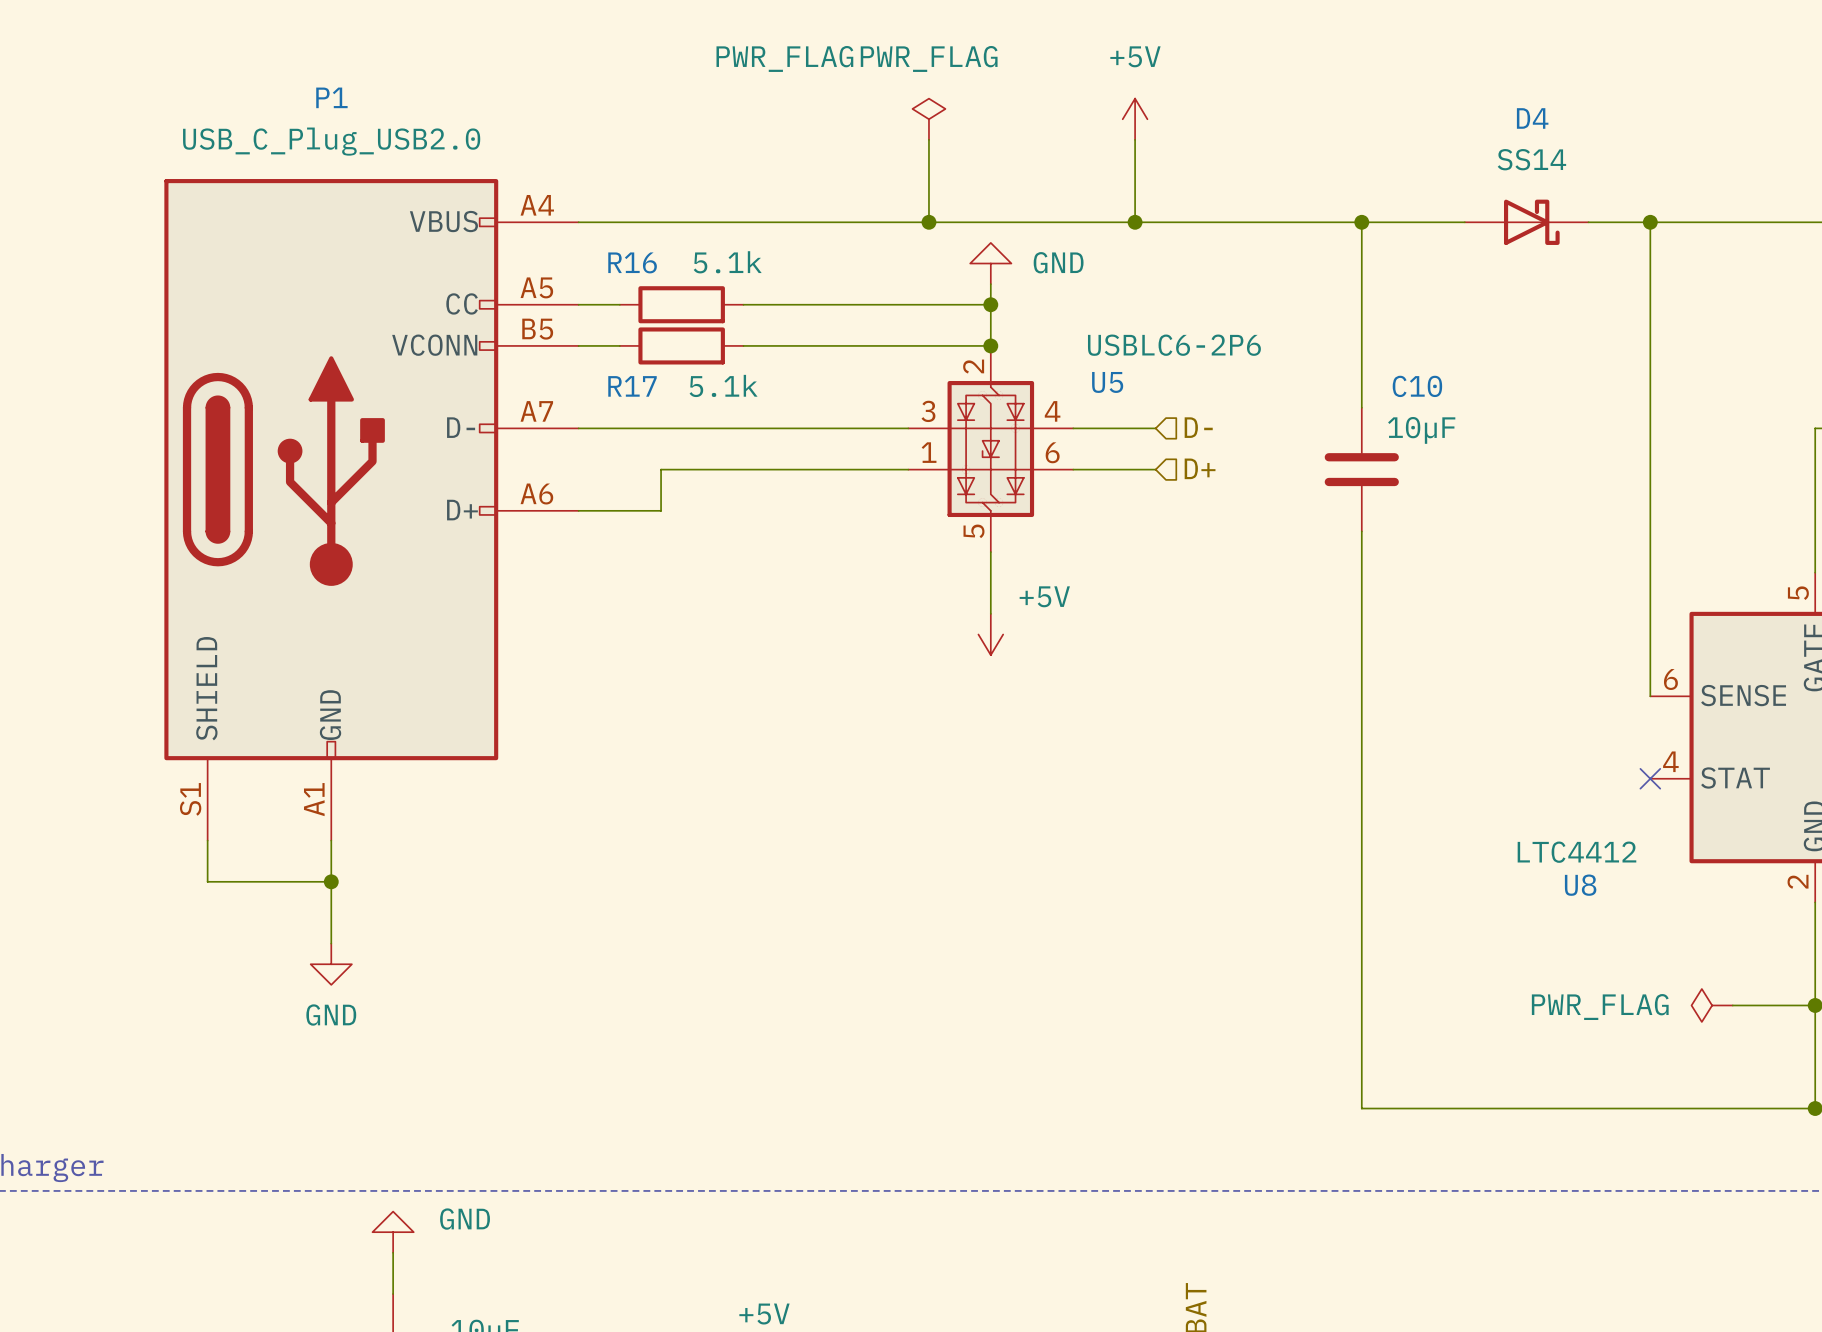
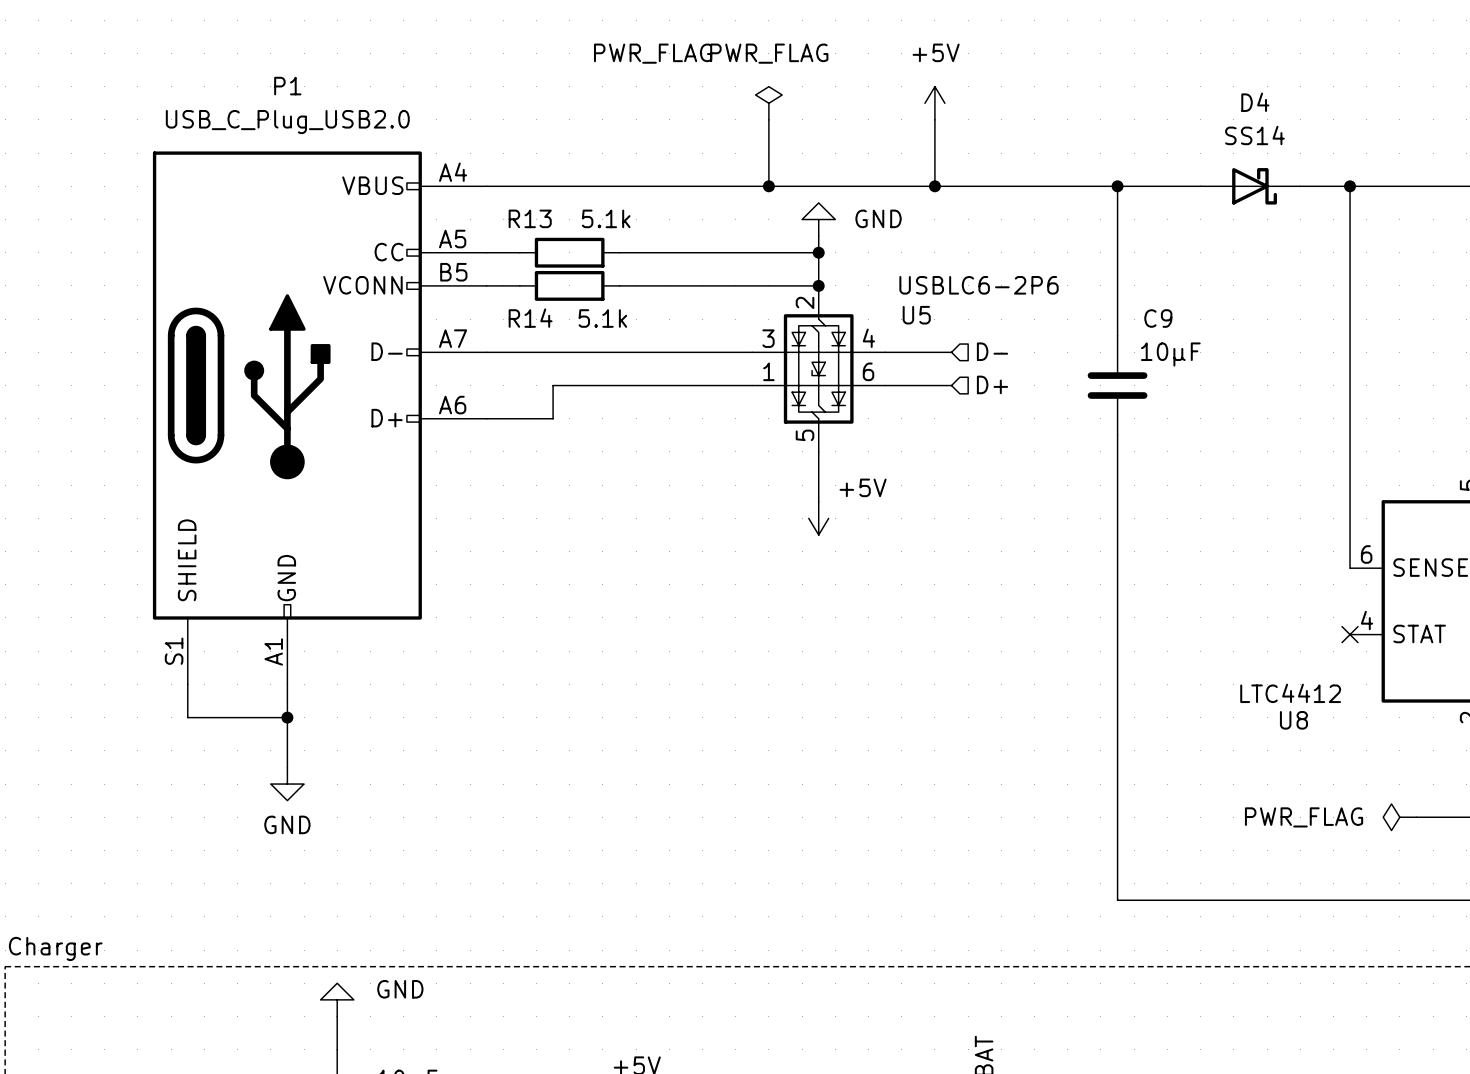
R16 name: R16 (632, 262) -> R13 (530, 218)
R17 name: R17 (632, 386) -> R14 (530, 318)
C10 name: C10 (1417, 386) -> C9 (1158, 318)

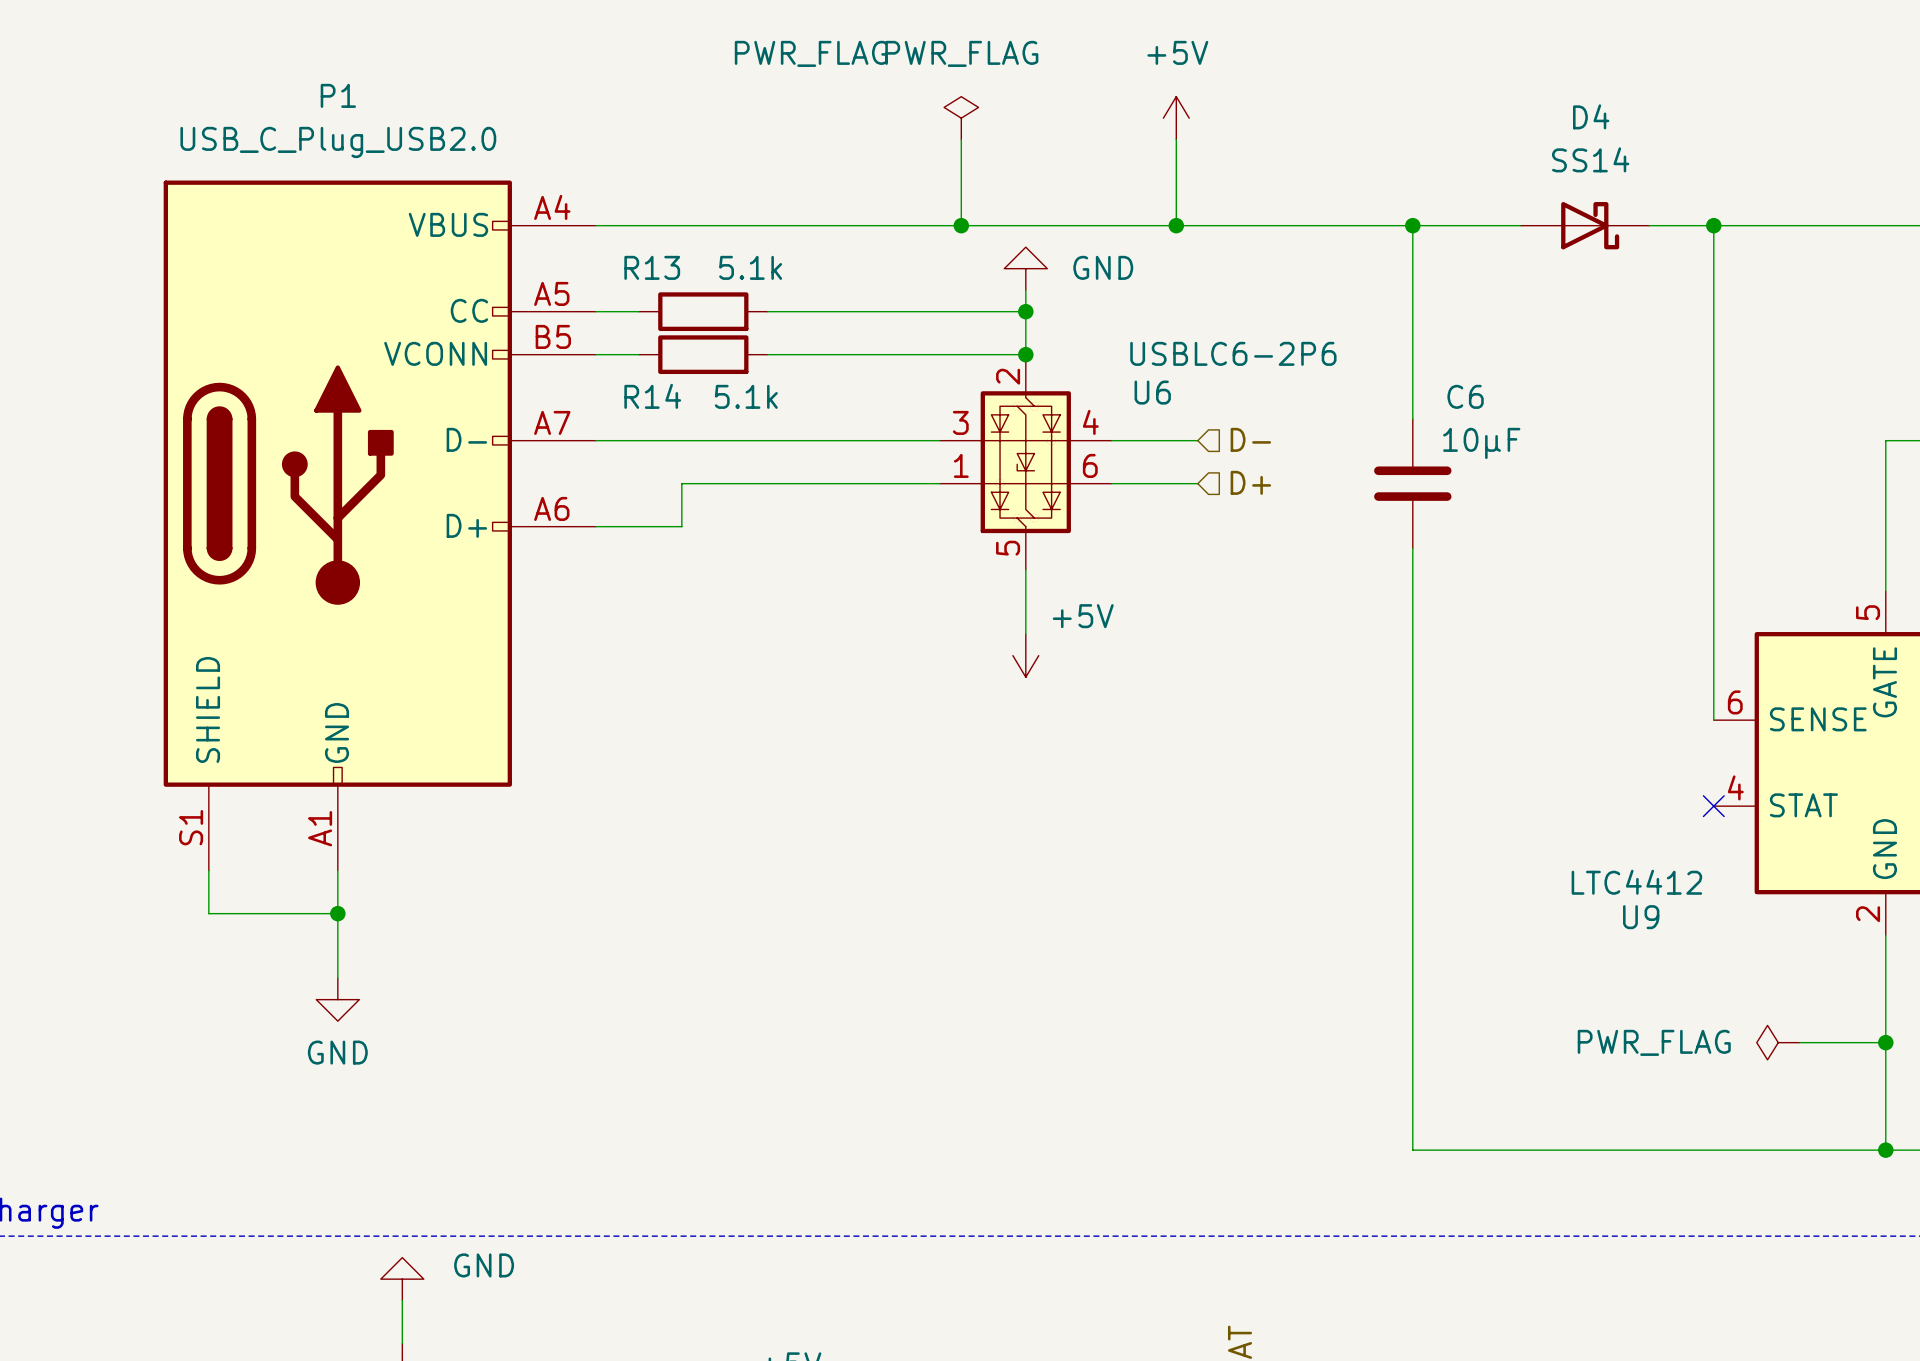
U5 name: U5 (916, 315) -> U6 (1152, 392)
C9 name: C9 (1158, 318) -> C6 (1465, 396)
U8 name: U8 (1293, 720) -> U9 (1641, 917)

